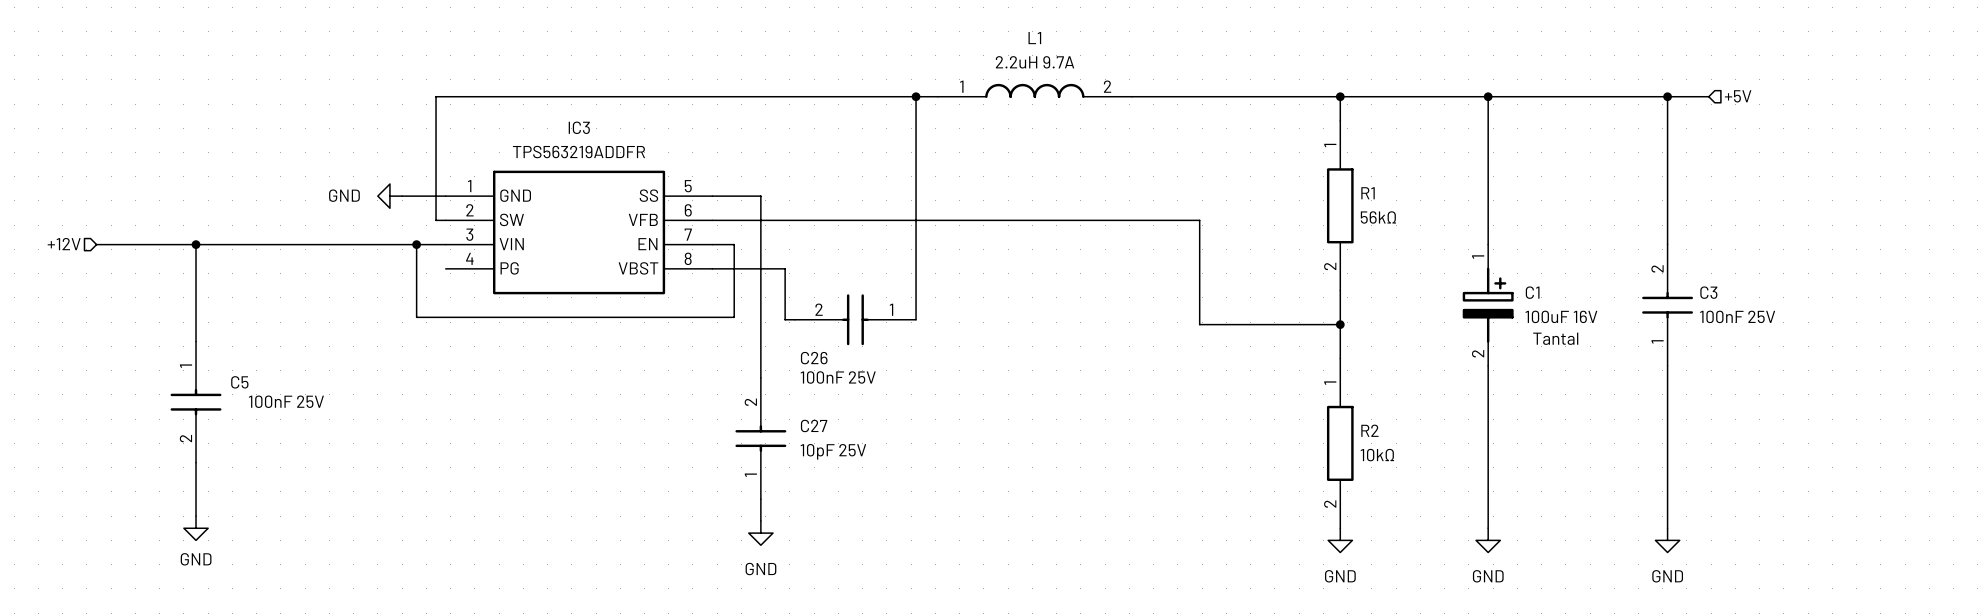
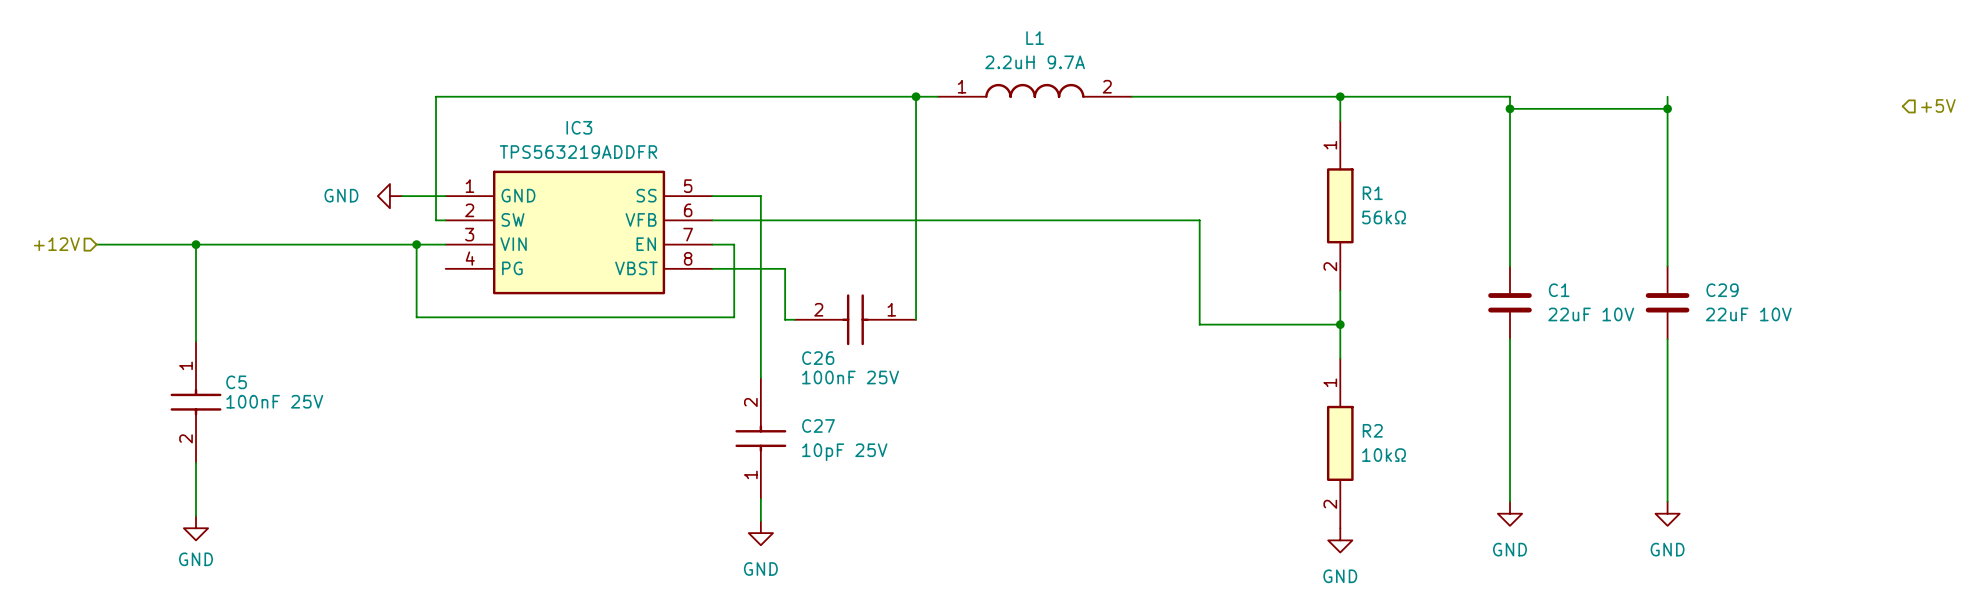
wire: (1488, 96) (1488, 244) -> none
junction position: (1488, 96) -> (1509, 108)
wire: (1509, 96) (1708, 96) -> (1509, 96) (1509, 266)
junction position: (1667, 96) -> (1667, 108)
hierarchical label position: +5V (1738, 96) -> +5V (1938, 105)
wire: none -> (1509, 108) (1667, 108)
C1 symbol: [1462, 244, 1514, 366] -> [1488, 266, 1532, 340]
C29: none -> 22uF 10V (1667, 302)
C3: 100nF 25V (1667, 305) -> none
C1 value: 100uF 16V (1561, 316) -> 22uF 10V (1591, 314)
text: Tantal (1555, 338) -> none
wire: (1488, 365) (1488, 528) -> (1509, 339) (1509, 501)
power symbol position: GND (1488, 540) -> GND (1509, 513)
power symbol position: GND (1667, 540) -> GND (1667, 513)

